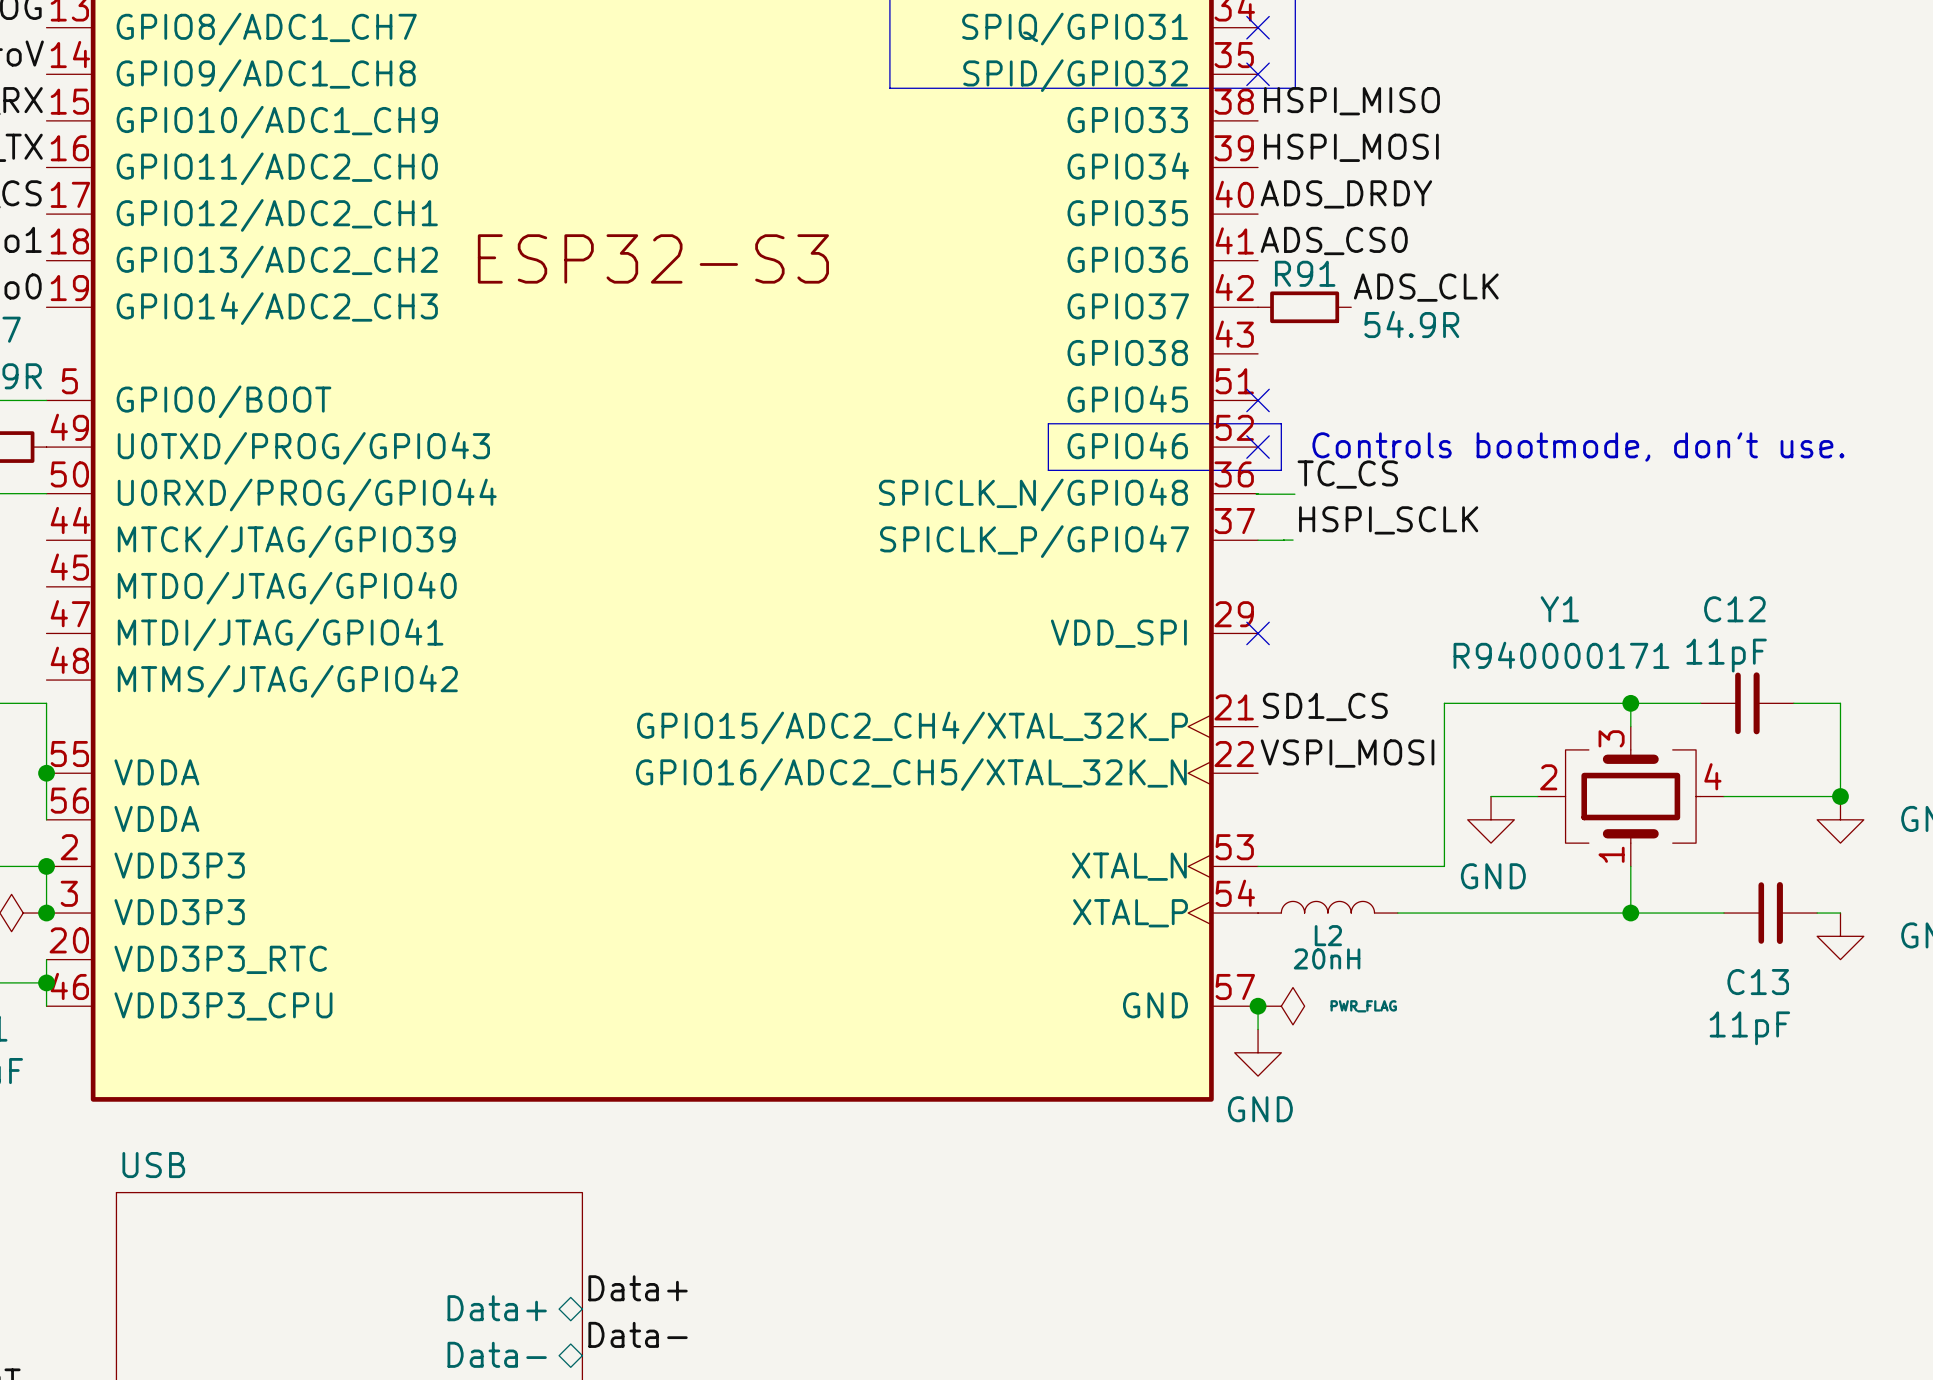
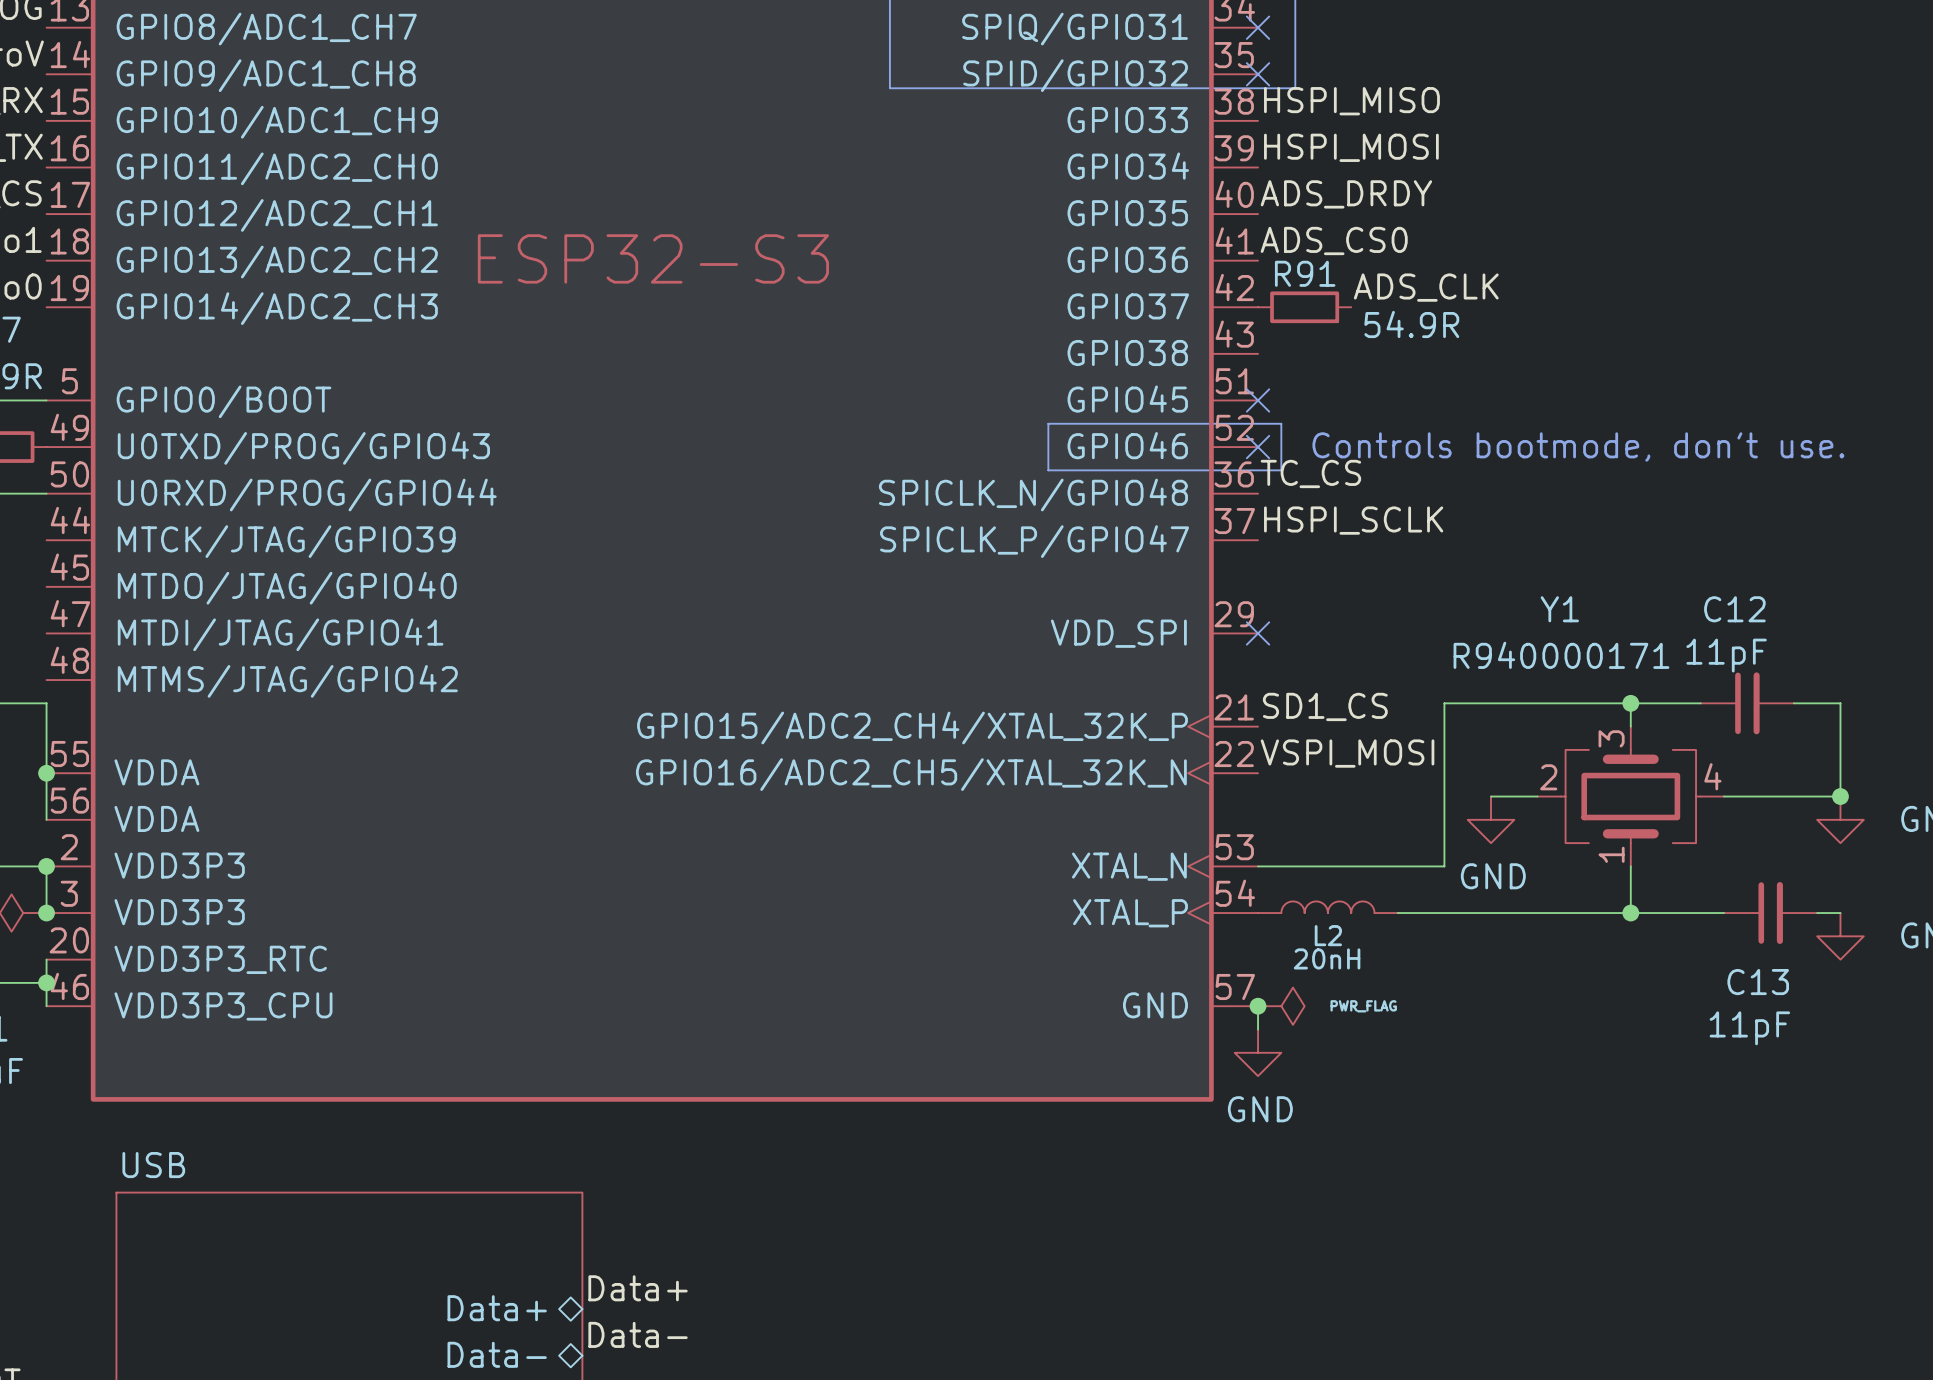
label position: TC_CS (1347, 474) -> TC_CS (1310, 473)
wire: (1258, 493) (1256, 494) (1294, 494) -> none
label position: HSPI_SCLK (1388, 520) -> HSPI_SCLK (1353, 520)
wire: (1258, 540) (1283, 540) -> none
wire: (1283, 540) (1293, 540) -> none

